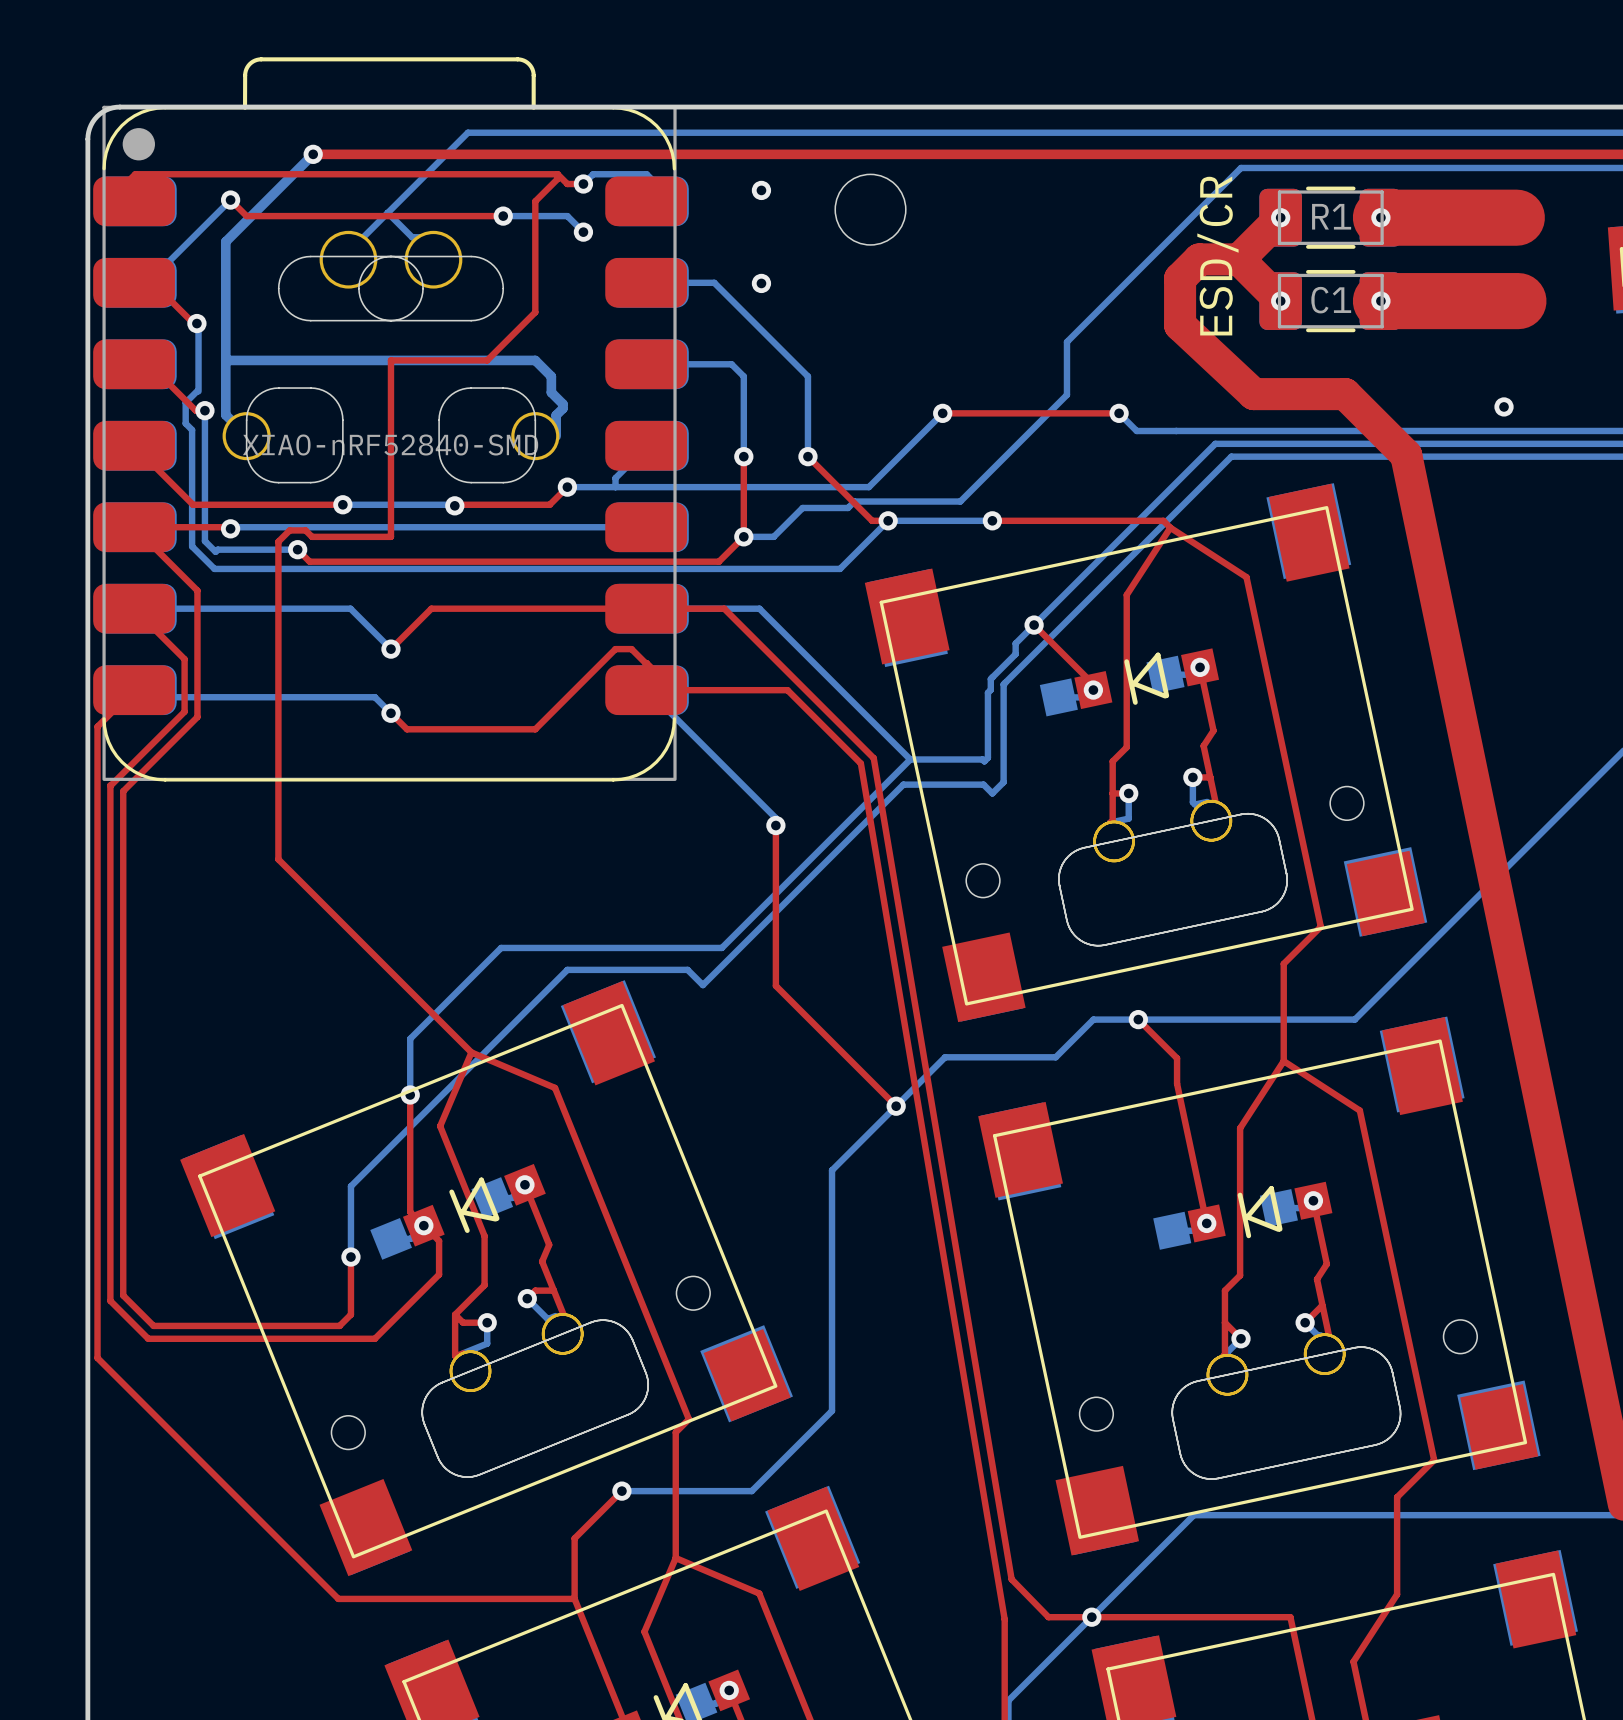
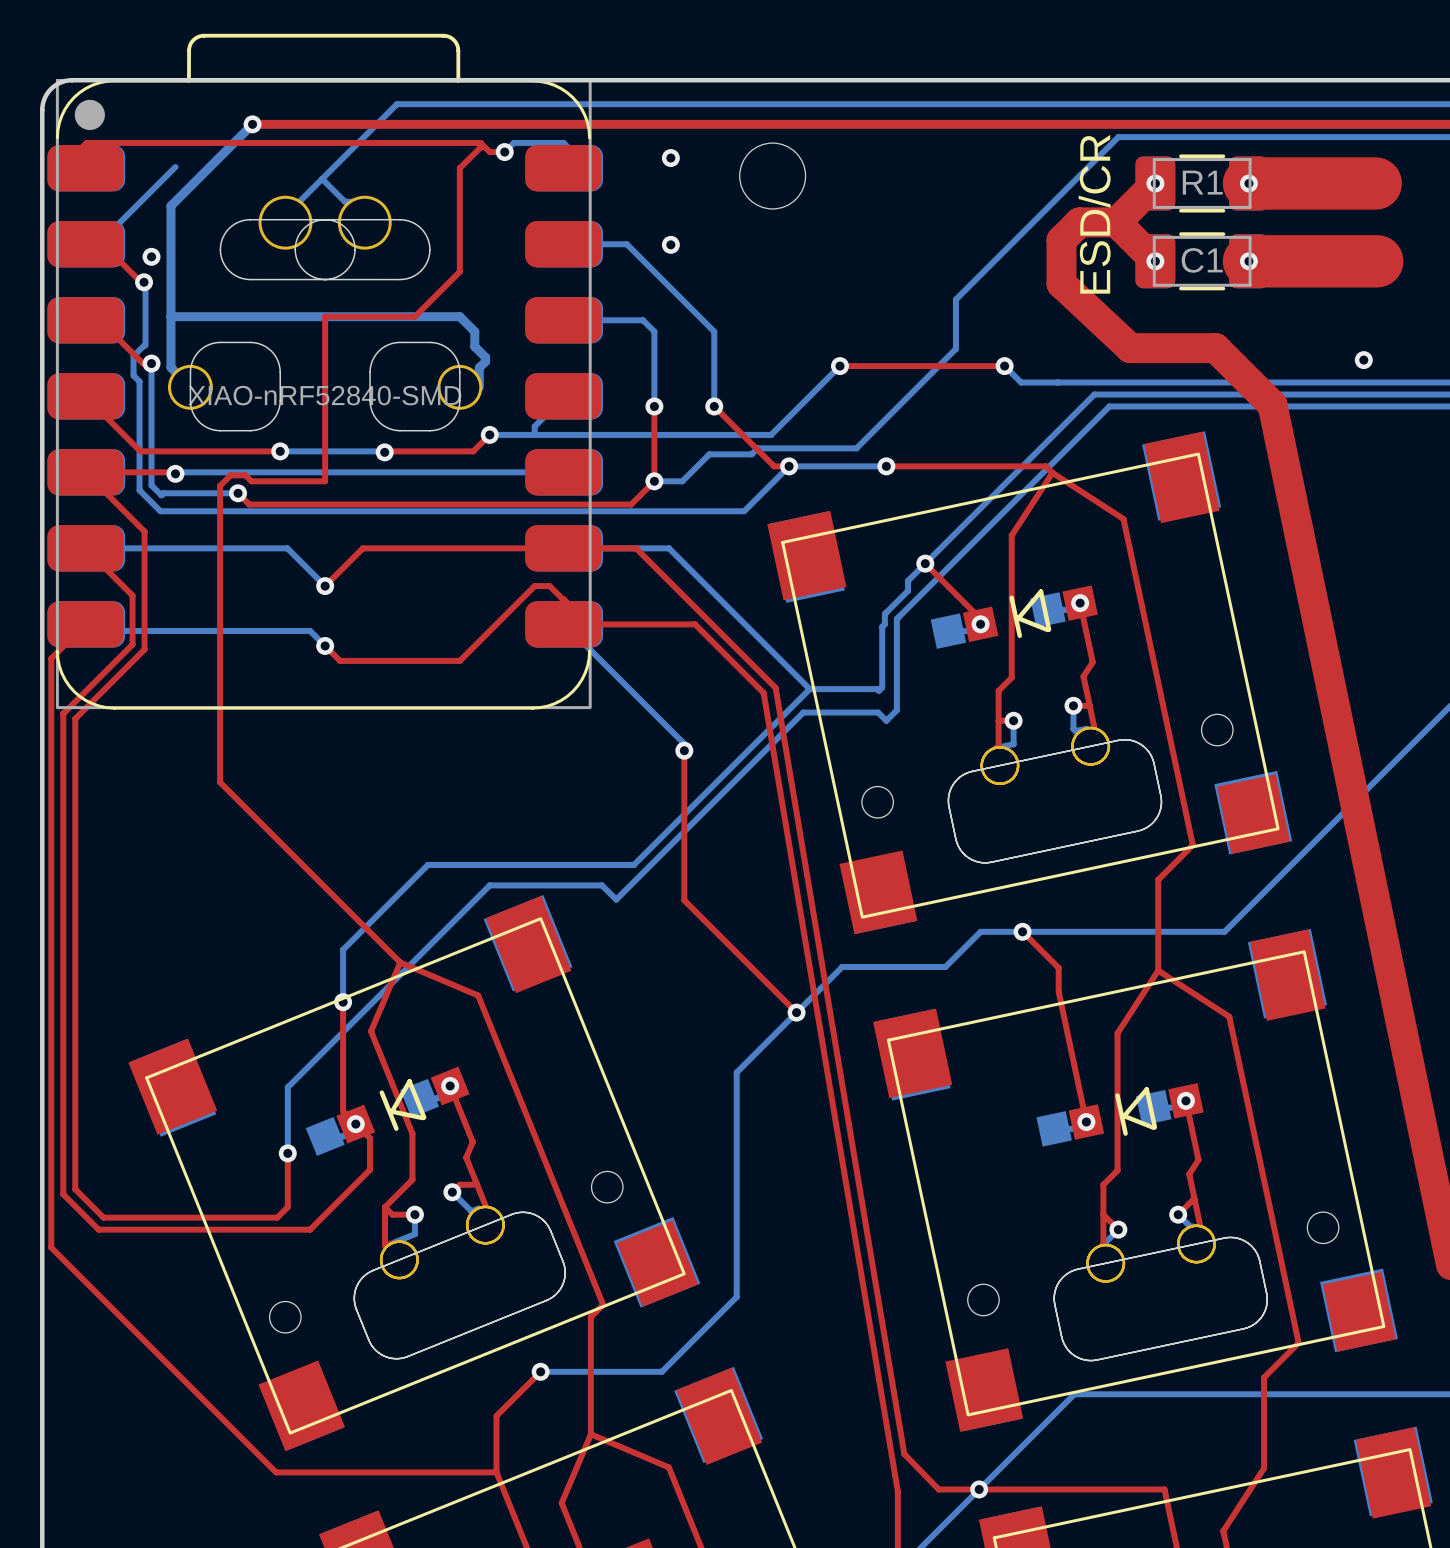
top track: (230, 200) (246, 216) (503, 216) -> none
via position: (230, 200) -> (151, 256)
bottom track: (503, 216) (567, 216) (583, 232) -> none
via: (503, 216) -> none
via: (583, 232) -> none

